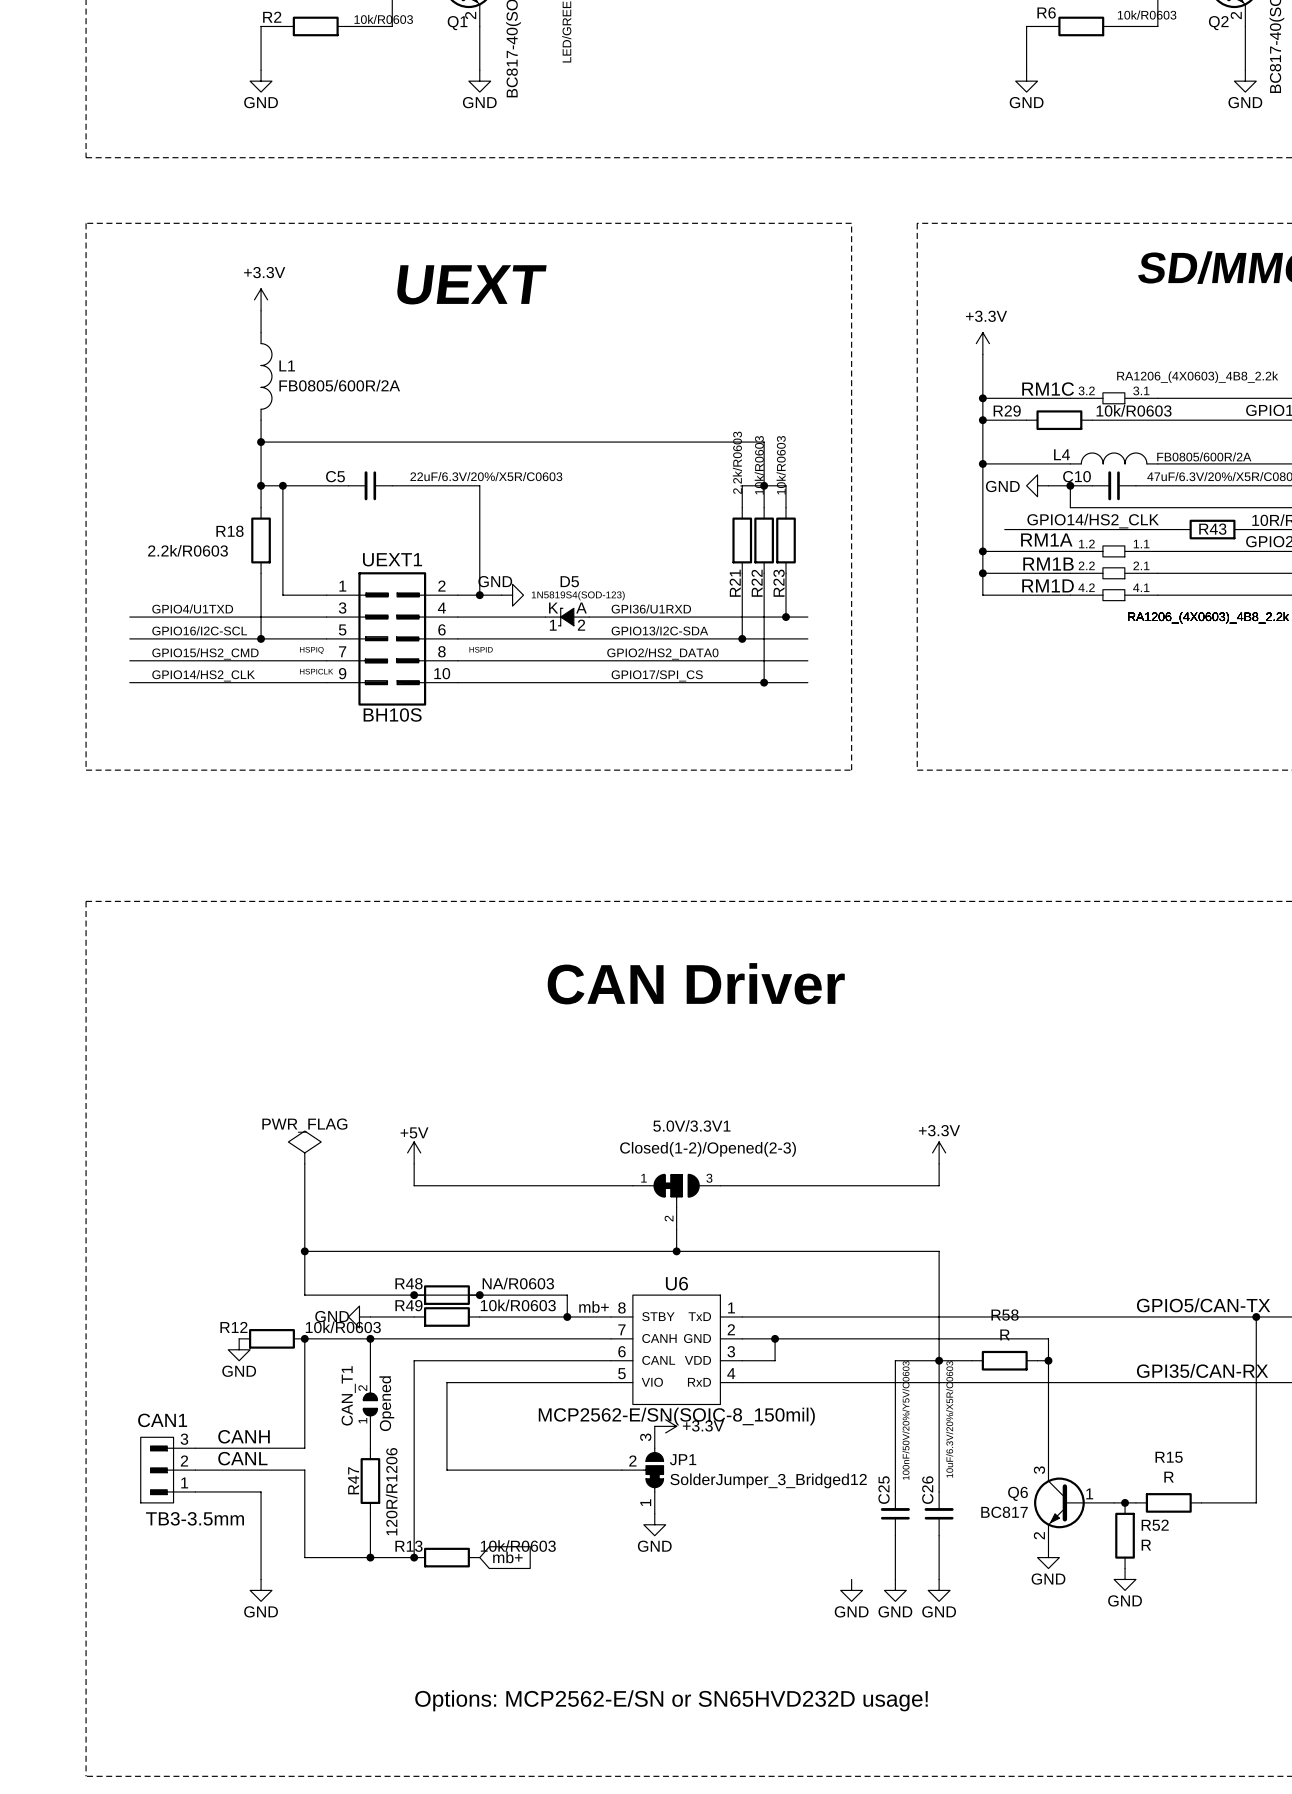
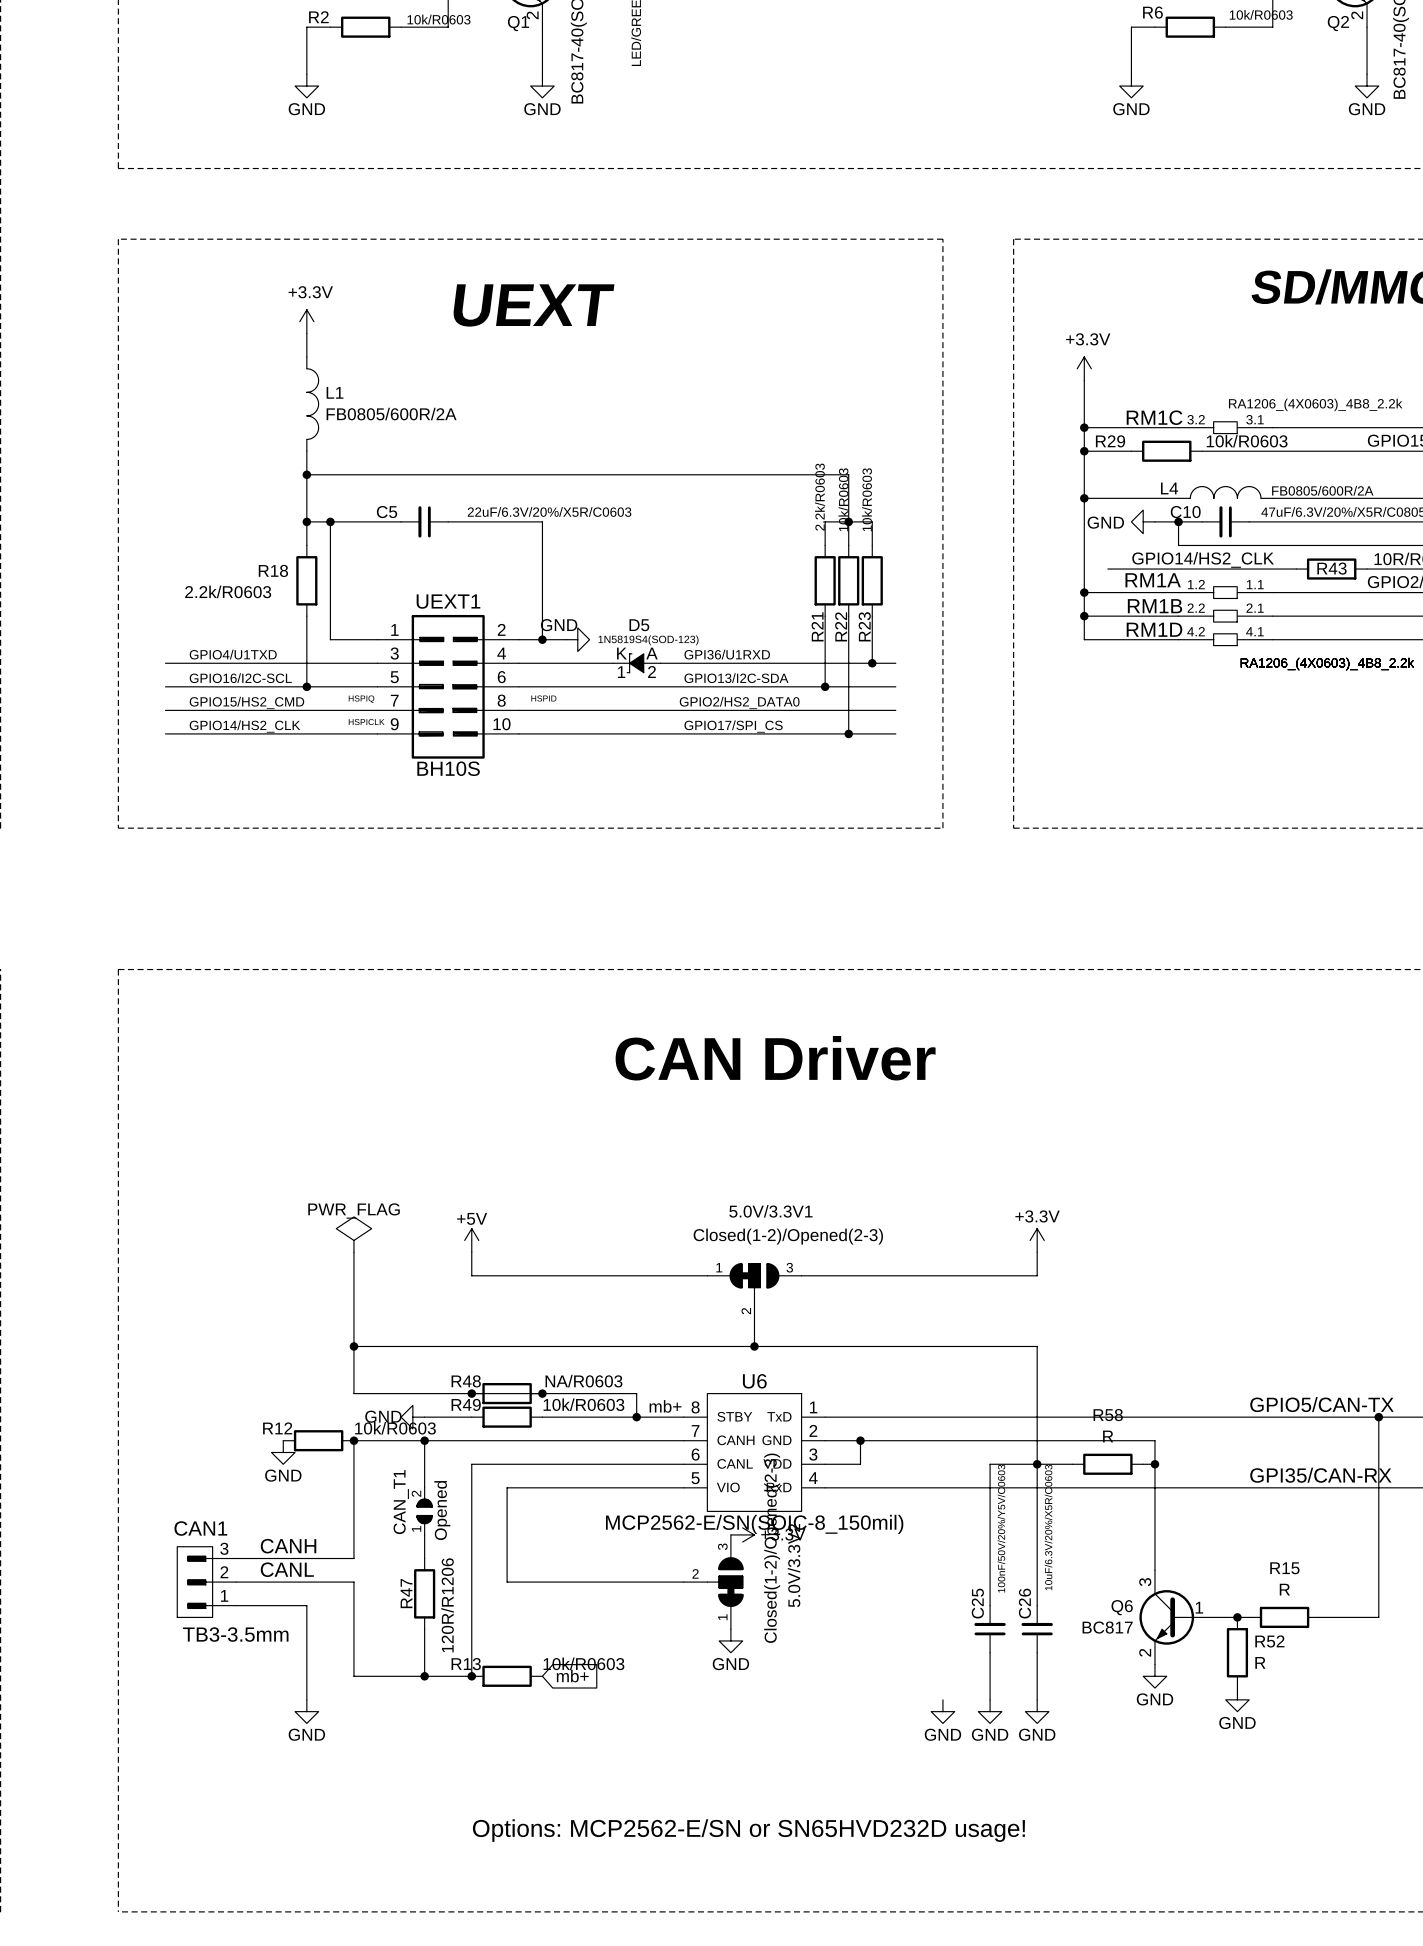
5.0V/3.3V2: none -> Closed(1-2)/Opened(2-3) (713, 1582)
JP1: SolderJumper_3_Bridged12 (642, 1470) -> none

